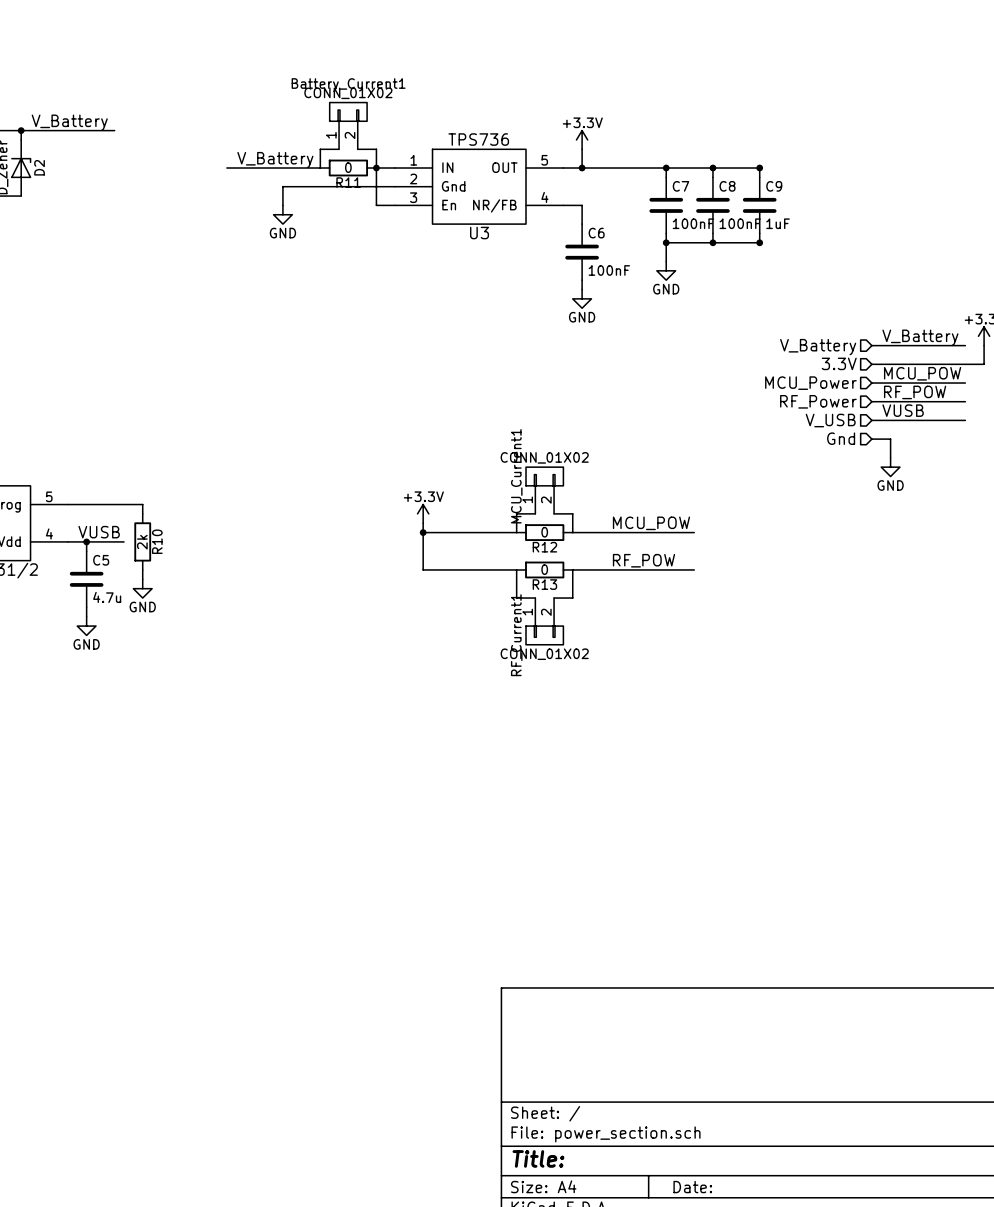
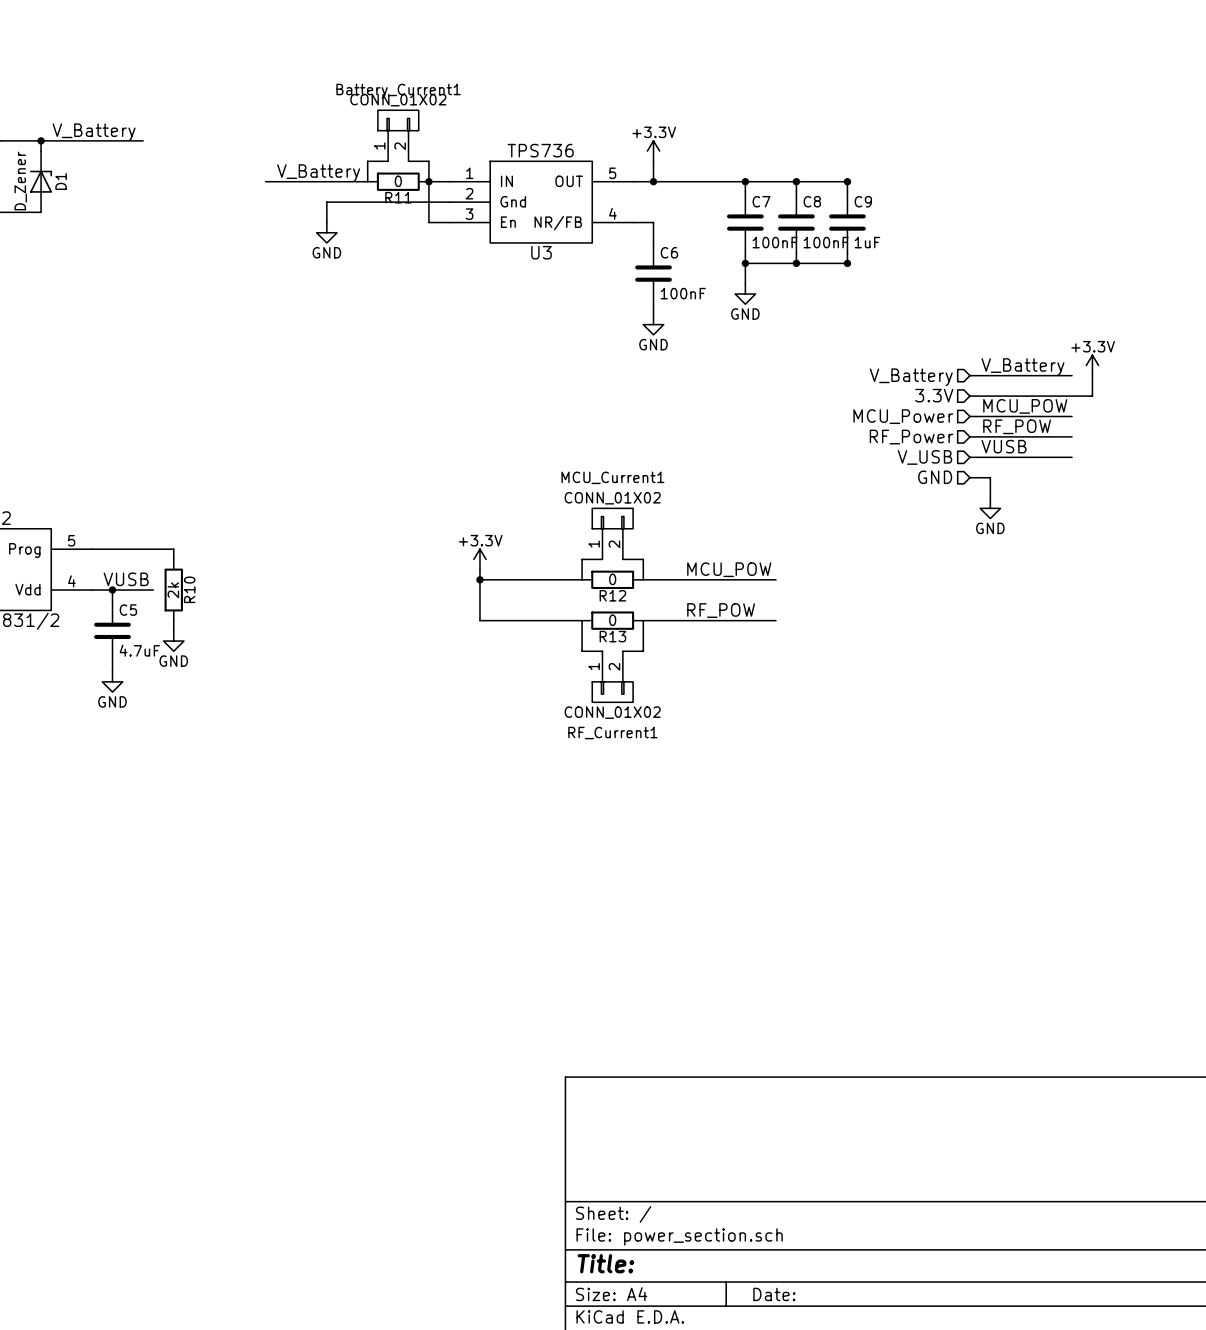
D2 name: D2 (39, 167) -> D1 (61, 181)
hierarchical label: Gnd (841, 438) -> GND (935, 477)
MCU_Current1 name rotation: 0° (516, 476) -> 90° clockwise (612, 477)
C5 value: 4.7u (107, 597) -> 4.7uF (139, 650)
RF_Current1 name rotation: 0° (516, 635) -> 90° clockwise (612, 733)

